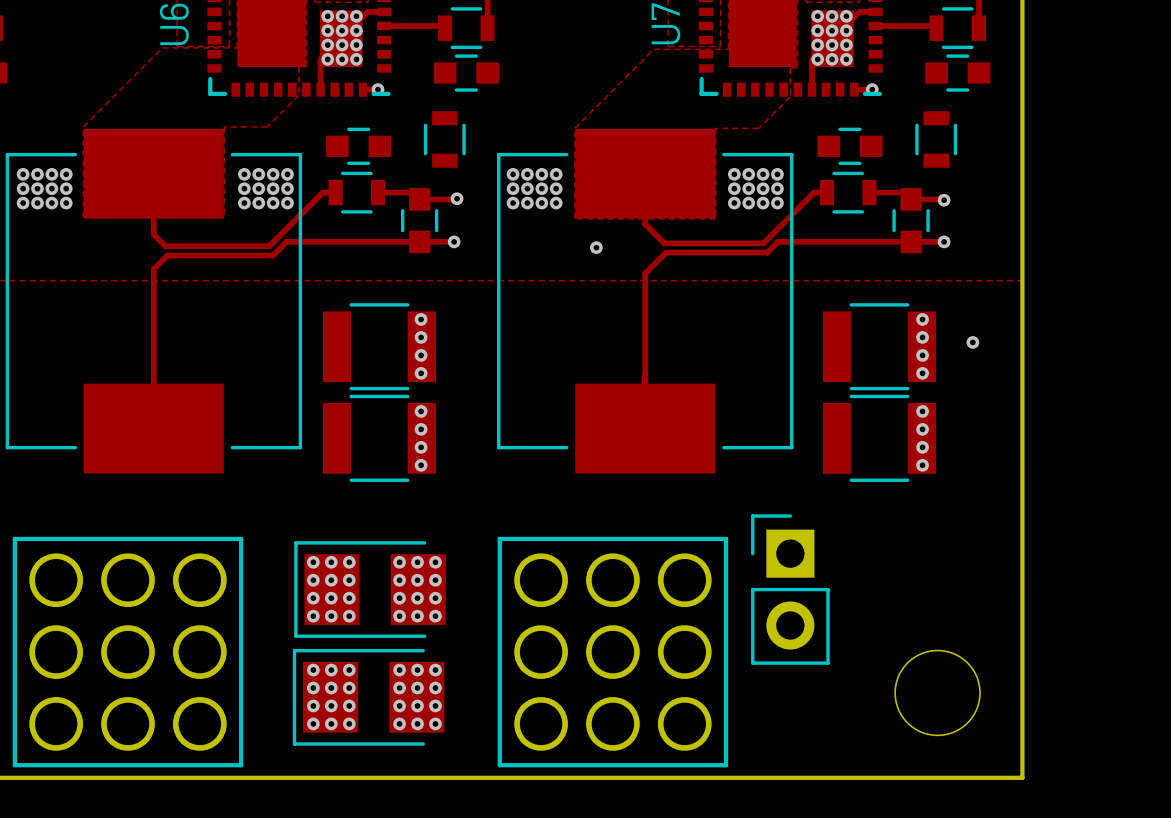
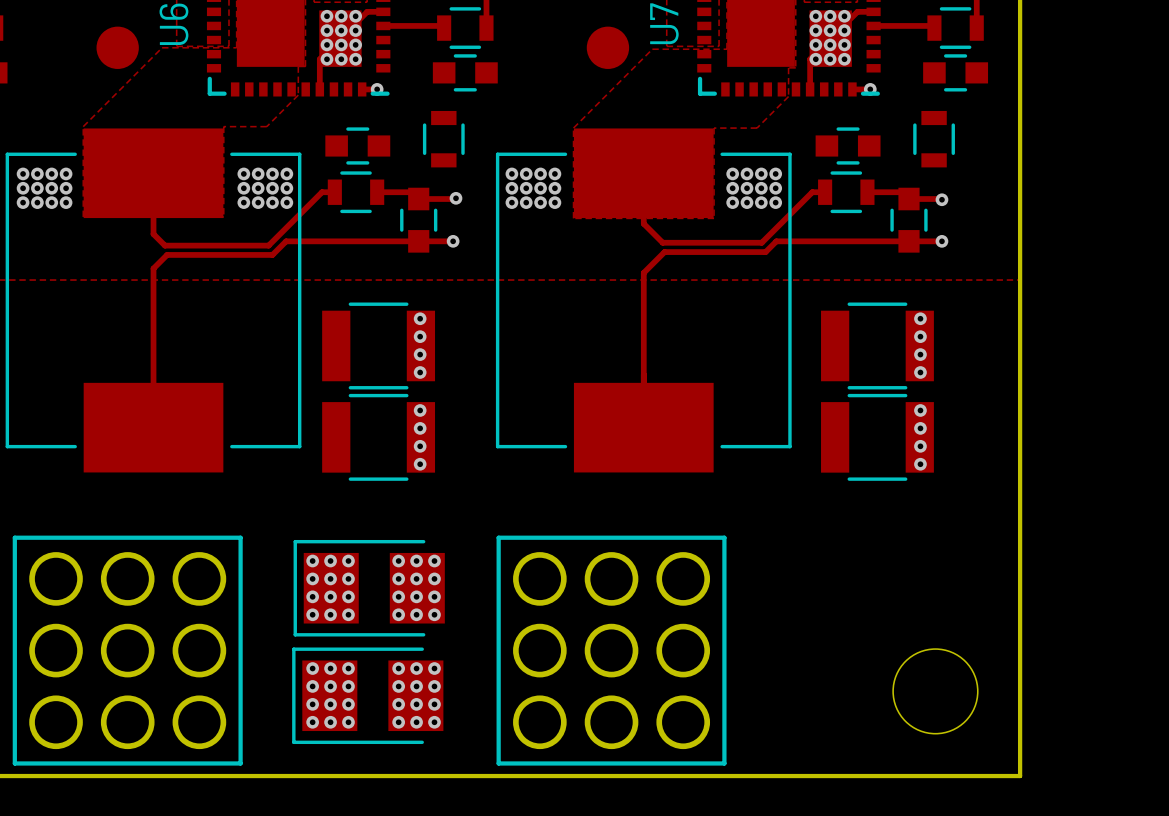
part: none -> (117, 47)
part: none -> (607, 47)
via: (596, 247) -> none
via: (972, 342) -> none
part: (790, 589) -> none

